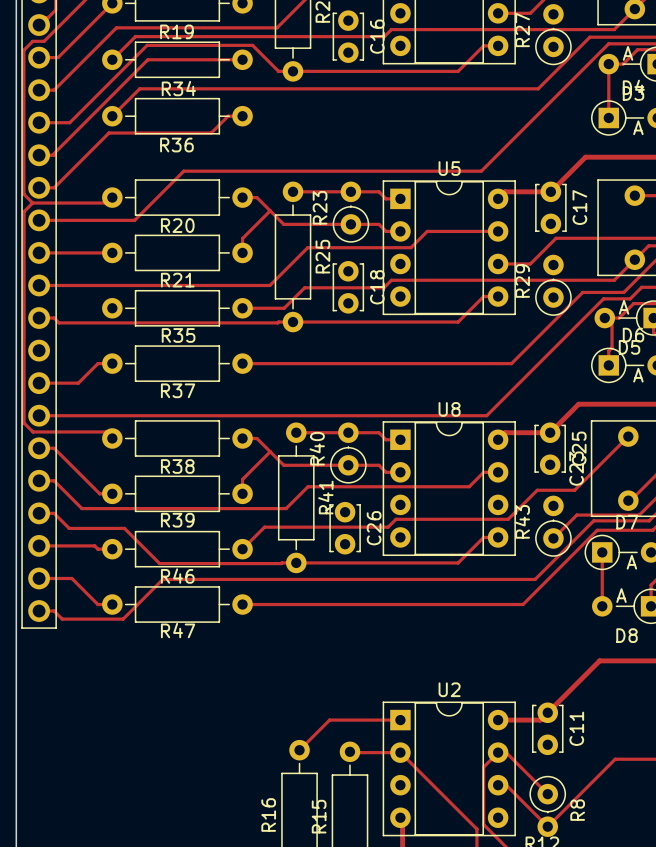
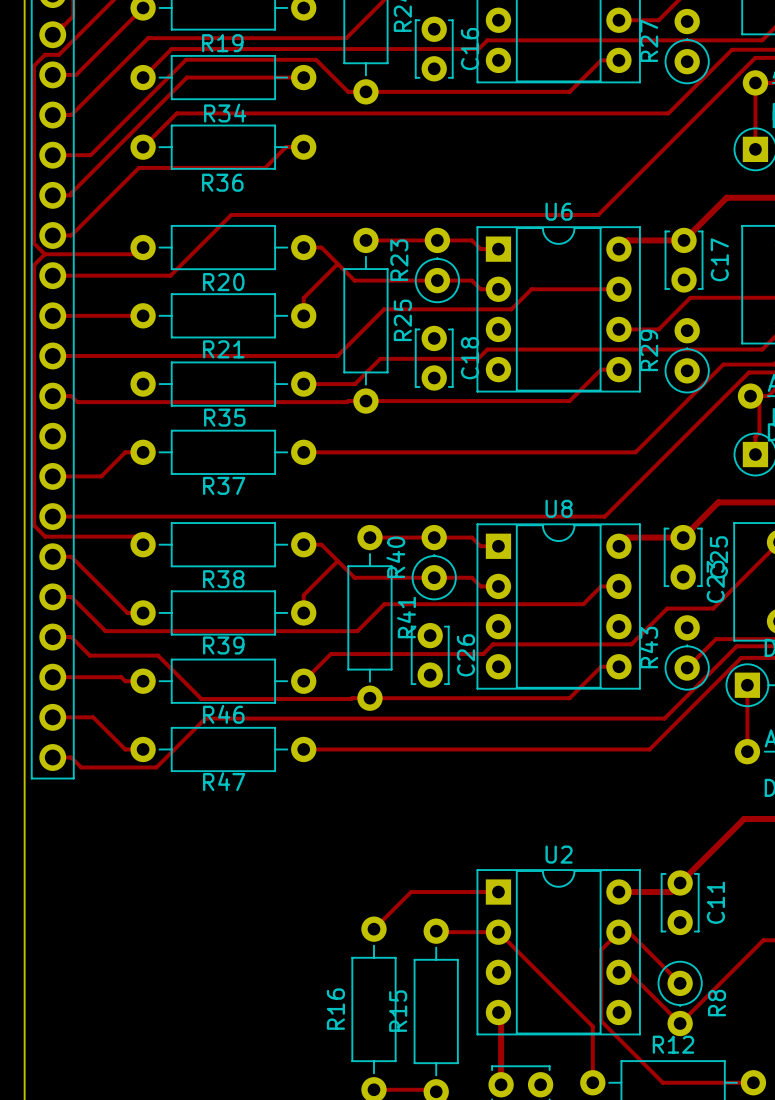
U5 name: U5 (449, 168) -> U6 (559, 211)

